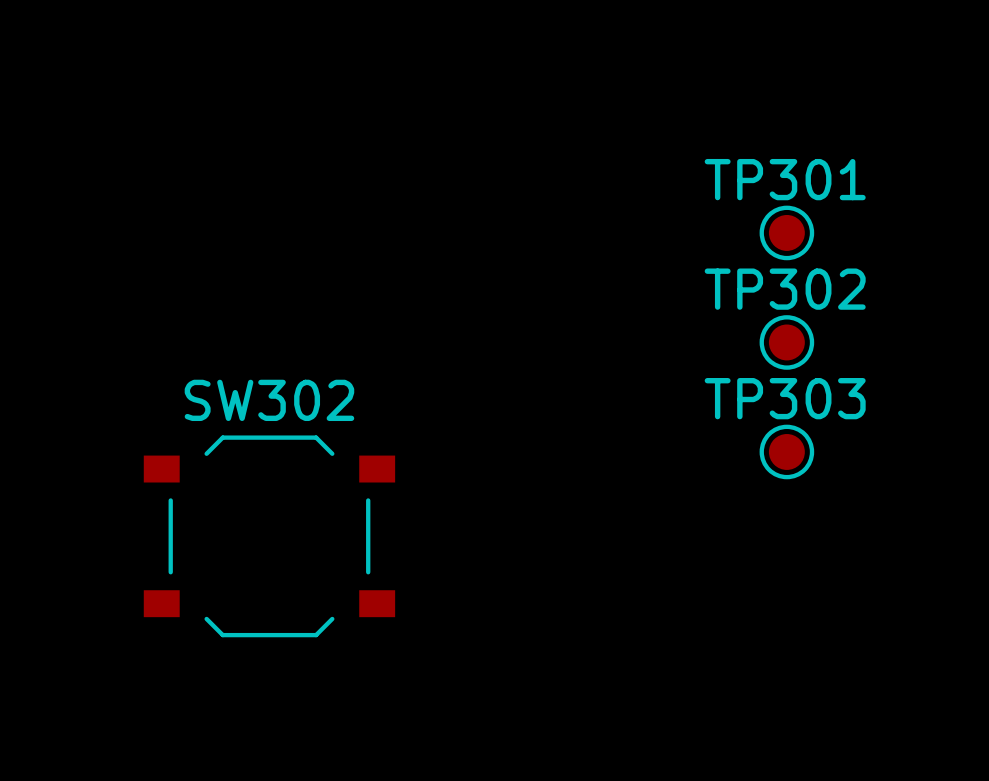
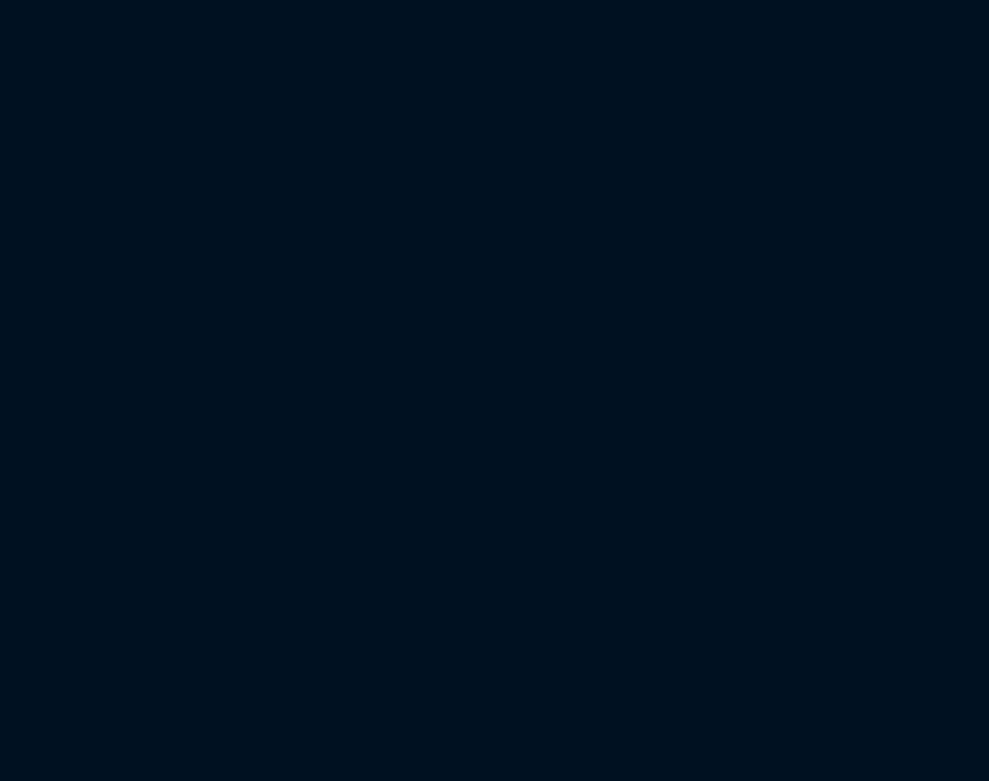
TP301: (786, 232) -> none
TP302: (786, 342) -> none
TP303: (786, 451) -> none
SW302: (269, 536) -> none

